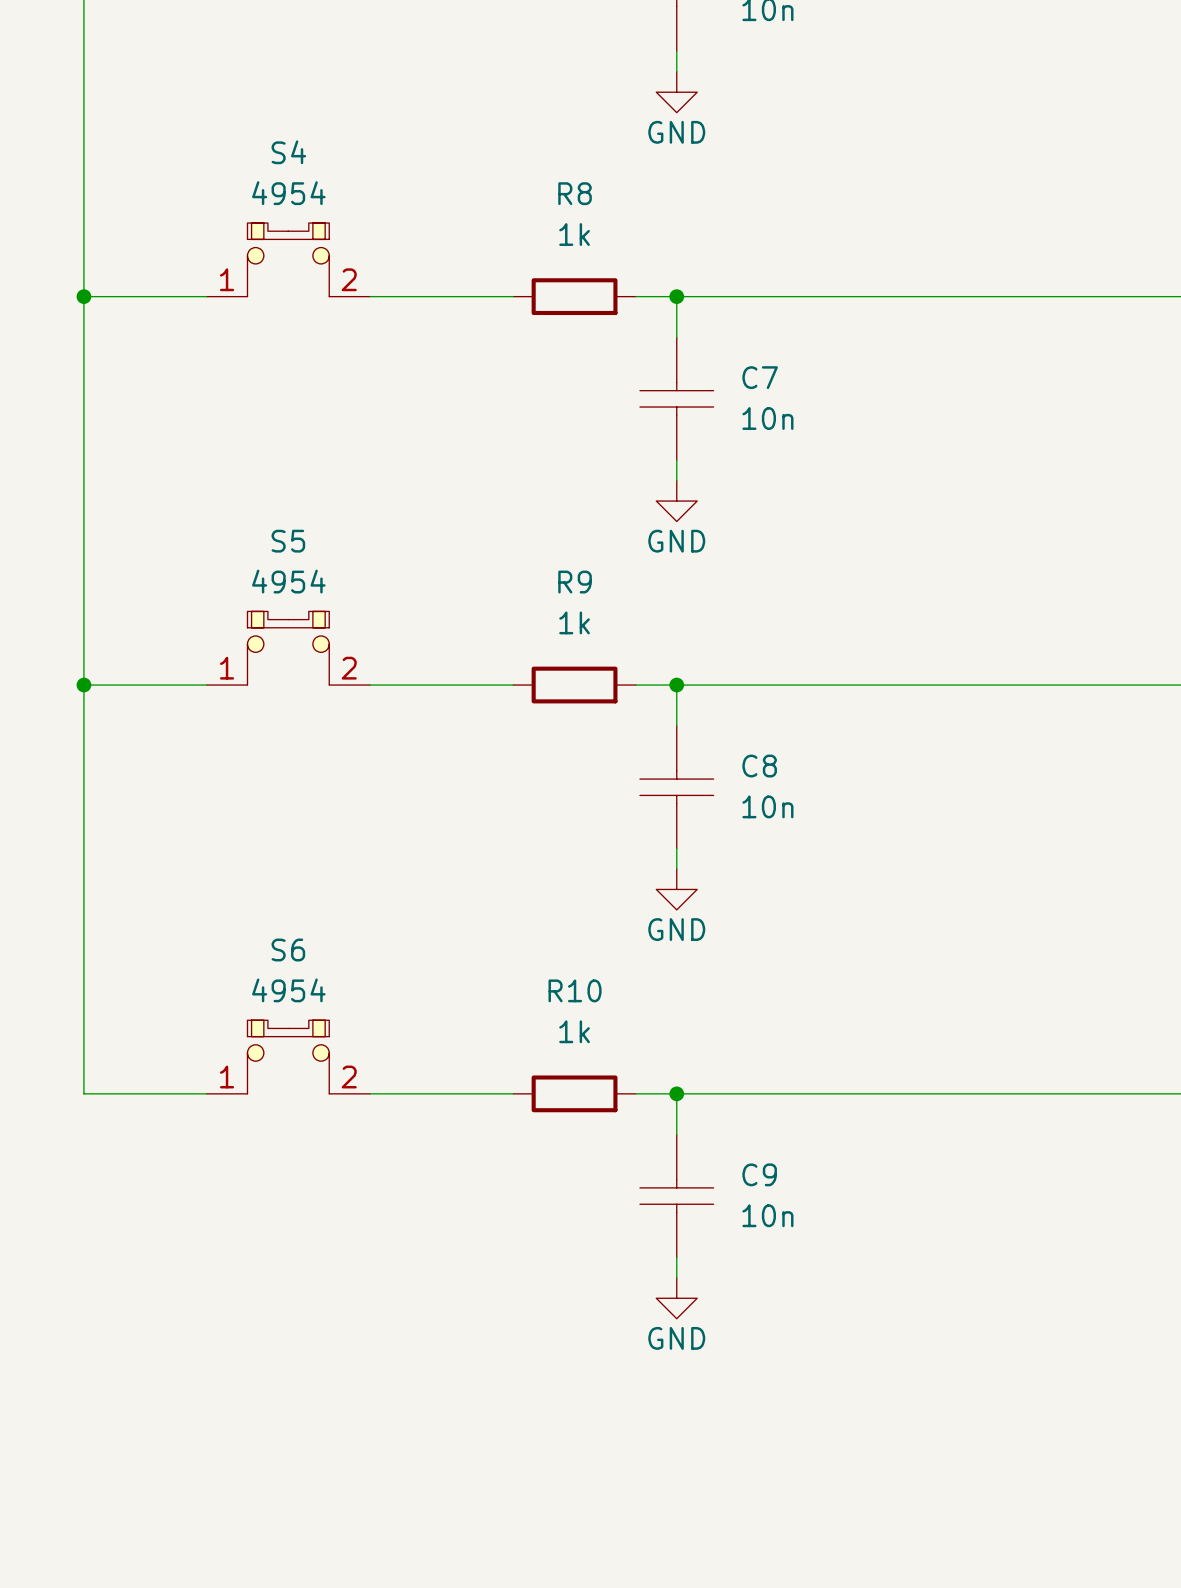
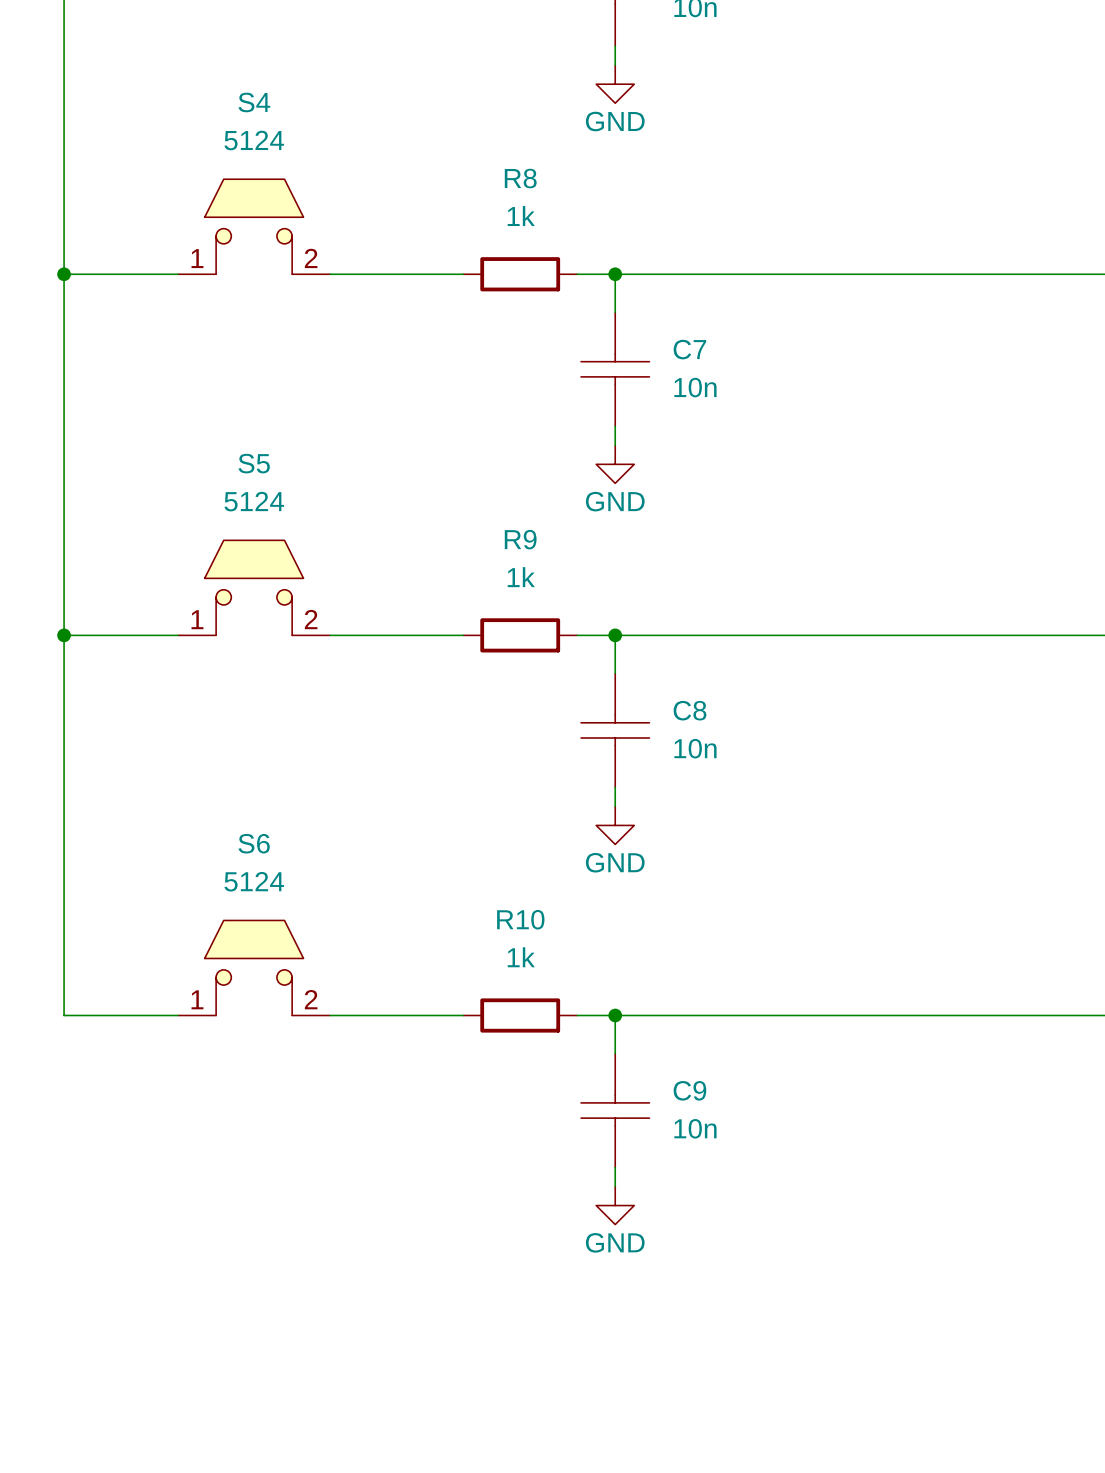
S4 value: 4954 (288, 193) -> 5124 (254, 140)
S4 symbol: [206, 223, 371, 297] -> [178, 179, 331, 275]
S5 value: 4954 (288, 581) -> 5124 (254, 501)
S5 symbol: [206, 611, 371, 686] -> [178, 540, 331, 636]
S6 value: 4954 (288, 990) -> 5124 (254, 881)
S6 symbol: [206, 1020, 371, 1094] -> [178, 920, 331, 1016]

